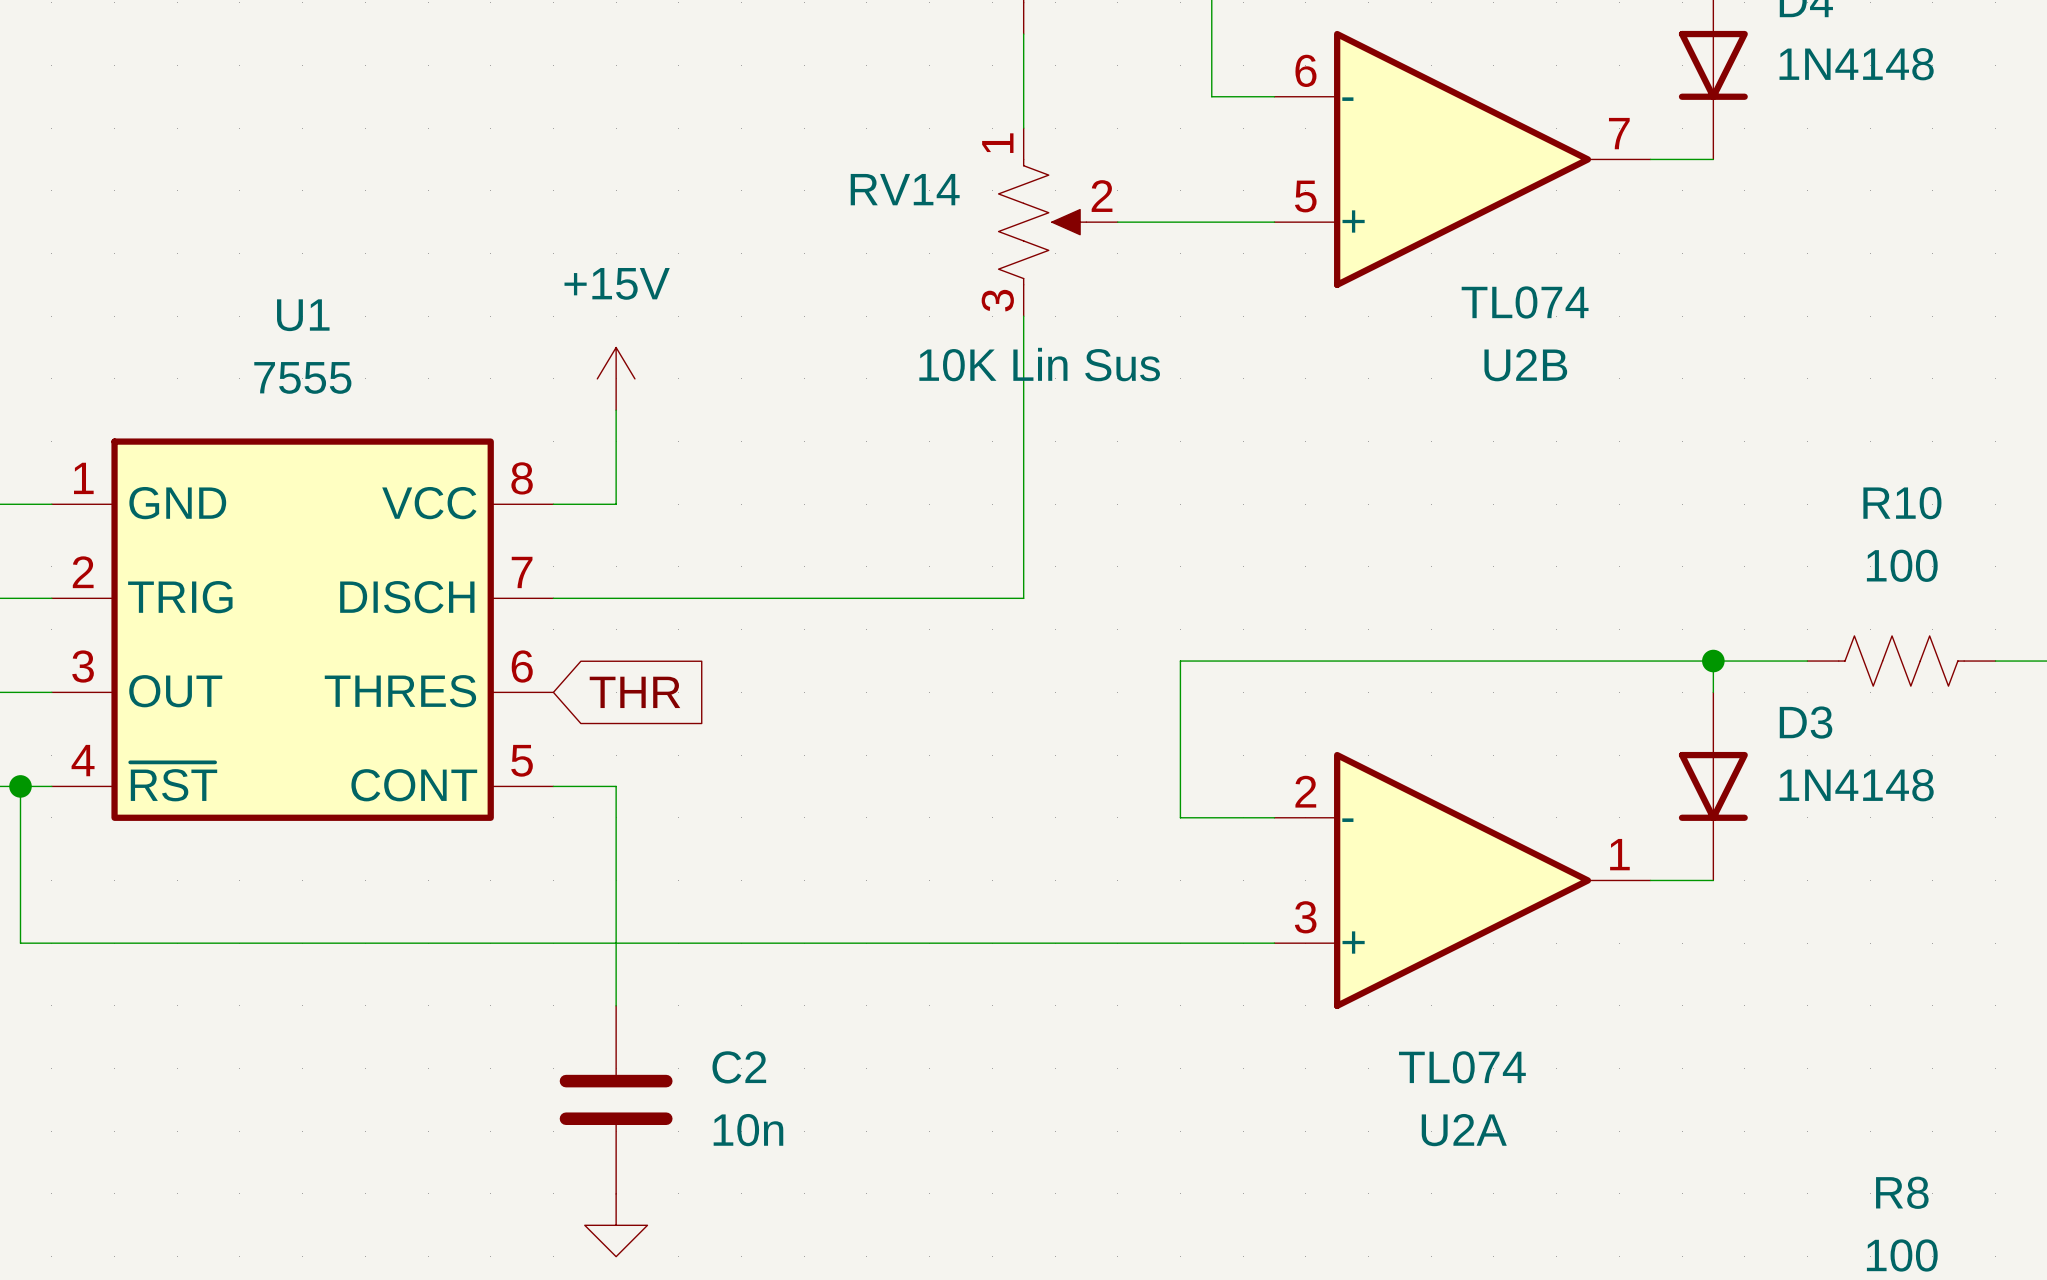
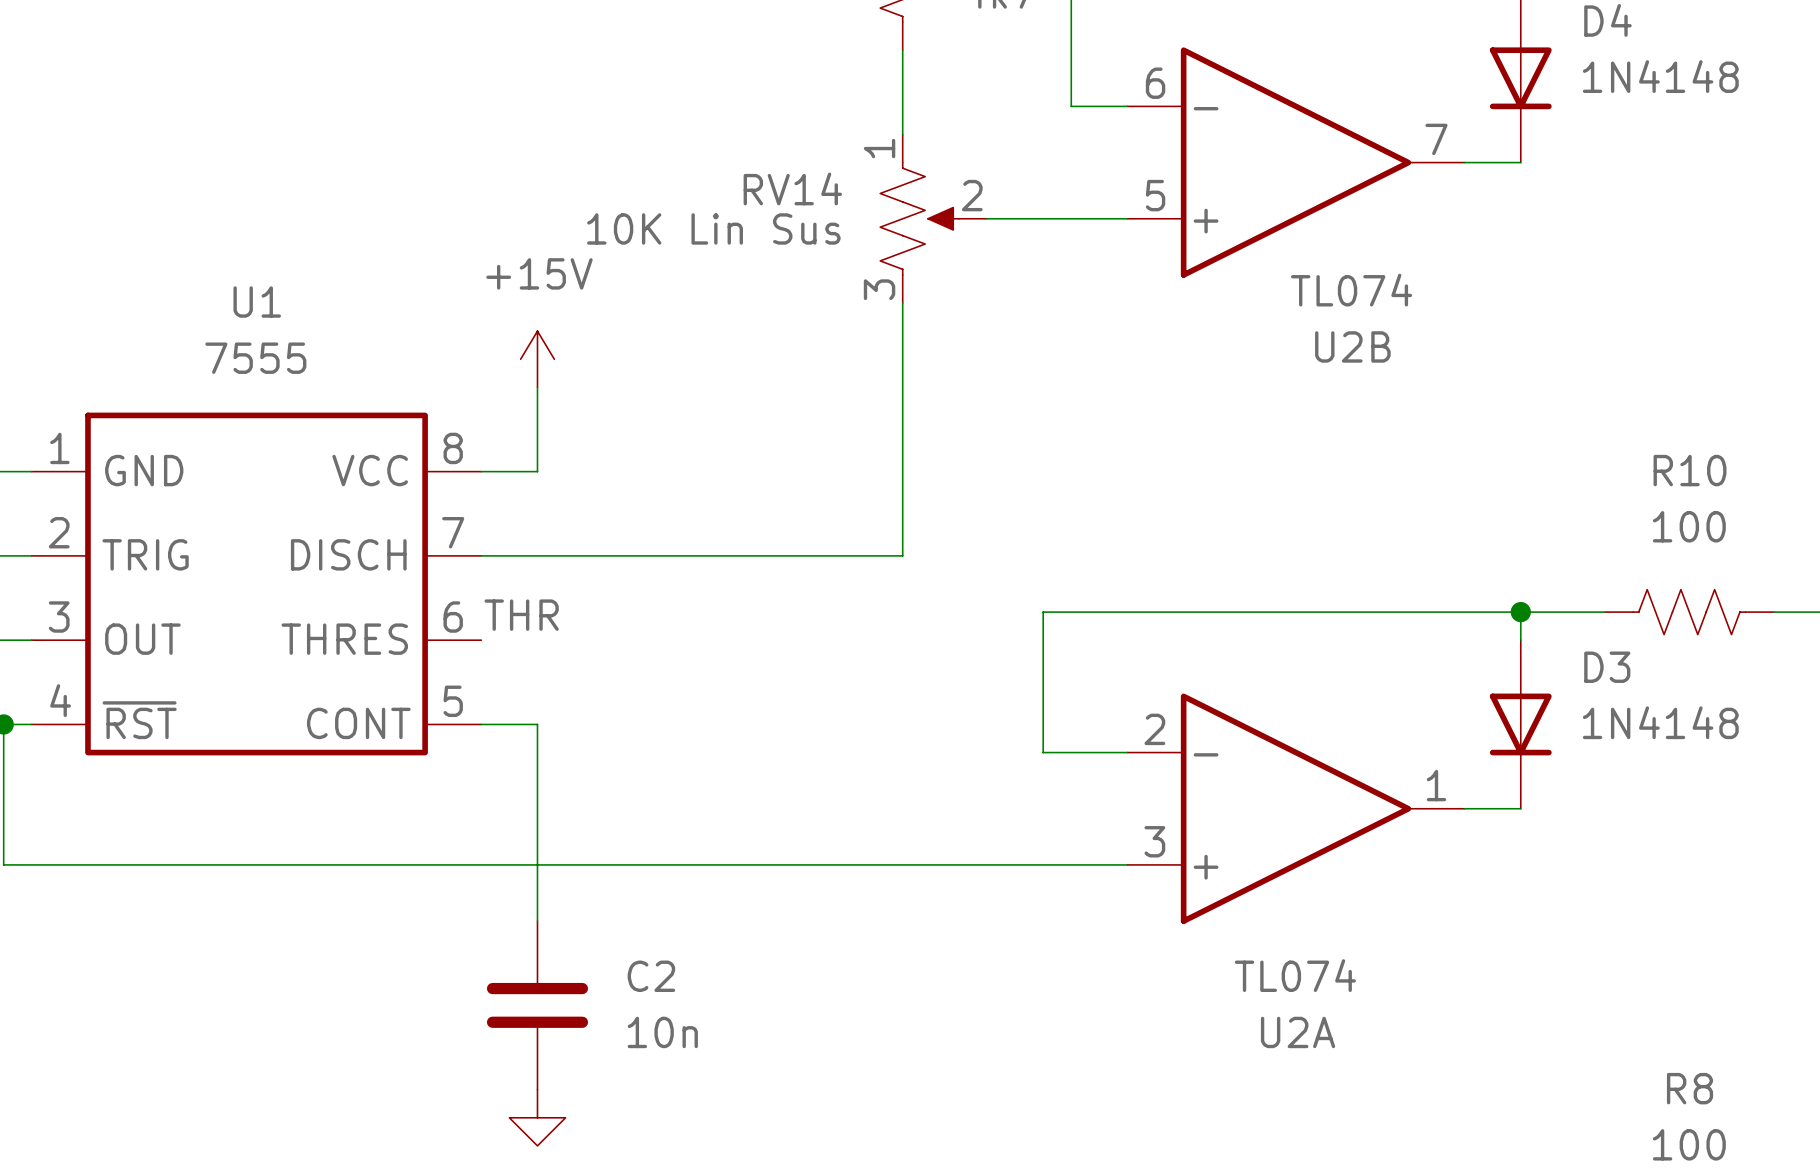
RV14 value position: 10K Lin Sus (1039, 364) -> 10K Lin Sus (713, 228)
label: none -> THR (521, 615)
global label: THR (634, 692) -> none

